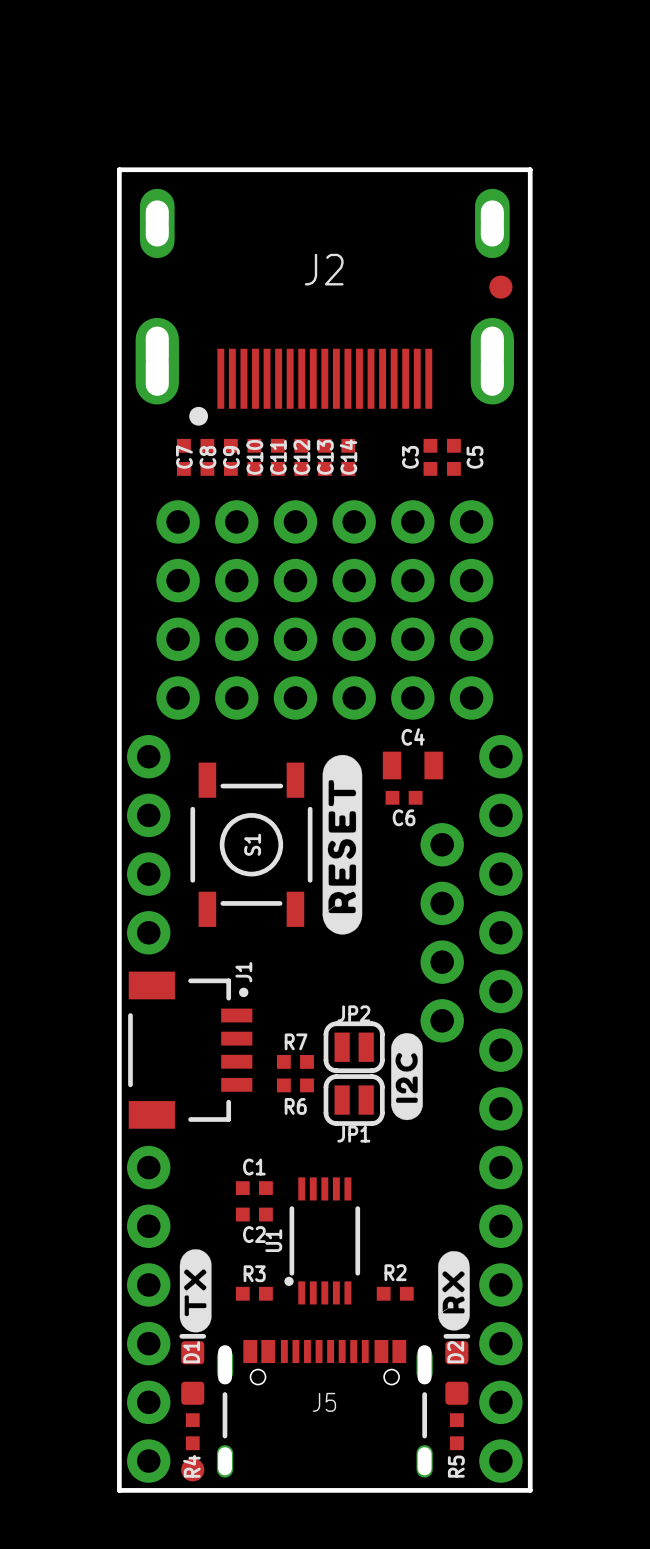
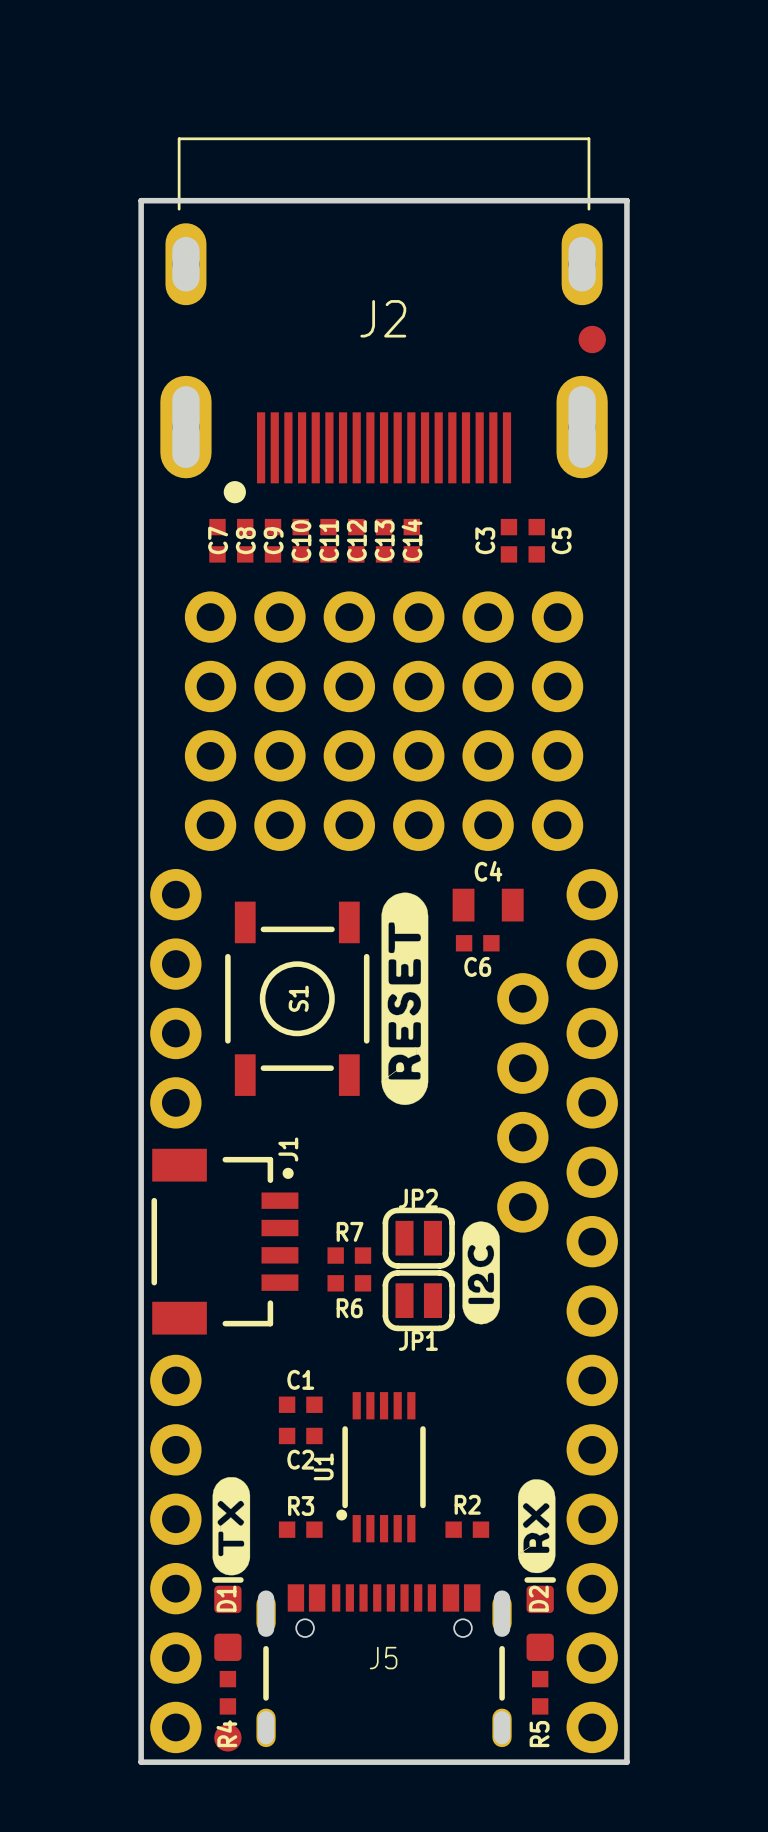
J2 footprint: [135, 188, 515, 426] -> [160, 137, 608, 504]

